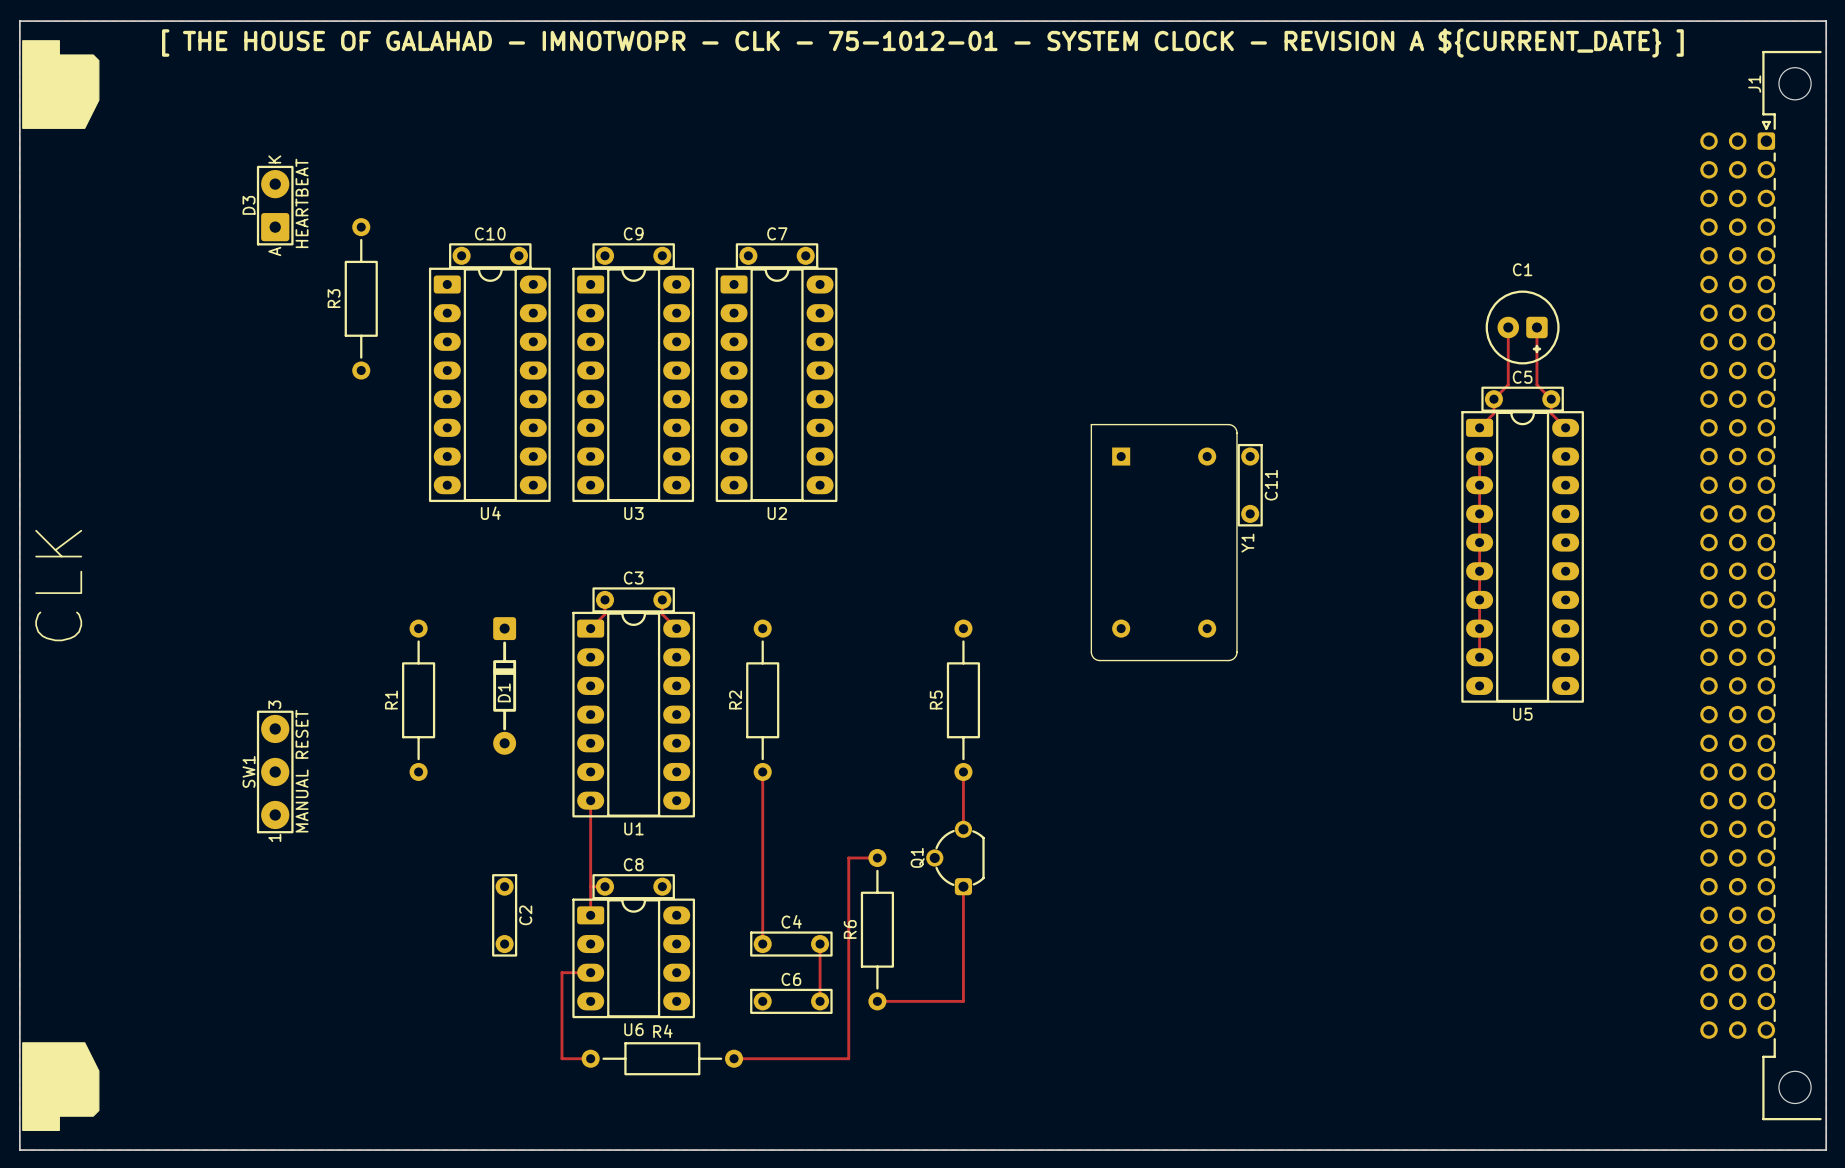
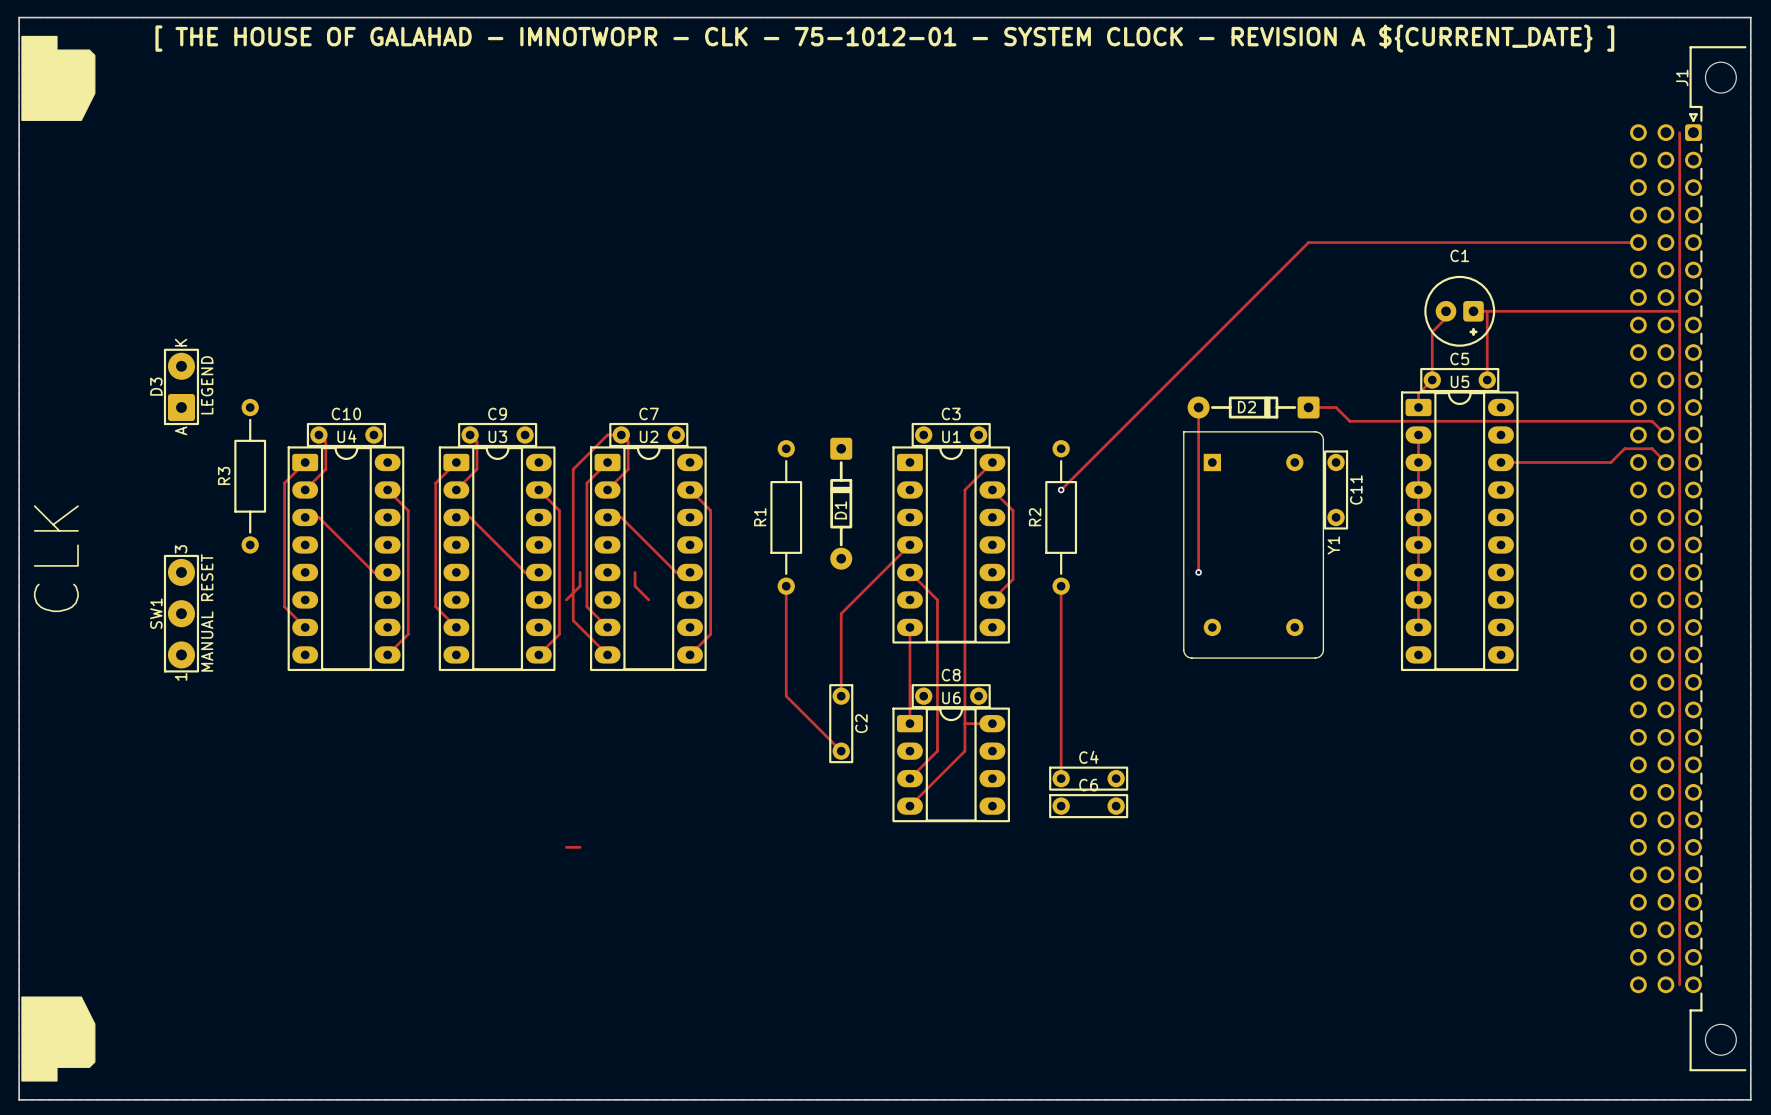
track: none -> (1679, 132) (1679, 984)
D3 text: HEARTBEAT (302, 203) -> LEGEND (207, 385)
D3 position: (275, 205) -> (181, 386)
C10 position: (490, 255) -> (346, 435)
C9 position: (633, 255) -> (497, 435)
C7 position: (777, 255) -> (648, 435)
track: none -> (1638, 242) (1308, 242) (1061, 489)
R3 position: (361, 298) -> (250, 476)
track: (1508, 327) (1508, 384) (1493, 399) (1493, 413) (1479, 427) -> (1446, 318) (1432, 331) (1432, 380) (1418, 393) (1418, 407)
track: (1536, 327) (1536, 384) (1551, 399) (1551, 413) (1565, 427) -> (1473, 311) (1679, 311)
track: none -> (1487, 311) (1487, 380)
U4 position: (489, 384) -> (345, 558)
U3 position: (633, 384) -> (497, 558)
U2 position: (776, 384) -> (648, 558)
track: none -> (1198, 407) (1198, 572)
D2: none -> (1253, 407)
track: none -> (1308, 407) (1336, 407) (1349, 421) (1652, 421) (1665, 435)
track: none -> (318, 435) (325, 441) (325, 469) (305, 489)
track: none -> (470, 435) (476, 441) (476, 469) (456, 489)
track: none -> (305, 462) (284, 483) (284, 606) (305, 627)
track: none -> (456, 462) (435, 483) (435, 606) (456, 627)
track: none -> (607, 462) (586, 483) (586, 606) (607, 627)
track: none -> (992, 462) (964, 489) (964, 751) (909, 806)
C11 position: (1250, 485) -> (1336, 489)
track: none -> (1500, 462) (1610, 462) (1624, 448) (1652, 448) (1665, 462)
track: none -> (387, 489) (408, 510) (408, 634) (387, 654)
U4 name position: U4 (490, 513) -> U4 (346, 436)
track: none -> (538, 489) (559, 510) (559, 634) (538, 654)
track: none -> (607, 489) (628, 469) (628, 441) (621, 435) (607, 435) (573, 469) (573, 620) (607, 654)
U3 name position: U3 (633, 513) -> U3 (497, 436)
track: none -> (690, 489) (710, 510) (710, 634) (690, 654)
U2 name position: U2 (777, 513) -> U2 (649, 436)
track: none -> (992, 489) (1013, 510) (1013, 579) (992, 599)
via: none -> (1061, 489)
track: none -> (305, 517) (318, 517) (373, 572) (387, 572)
track: none -> (456, 517) (470, 517) (525, 572) (538, 572)
track: none -> (607, 517) (621, 517) (676, 572) (690, 572)
Y1 position: (1164, 542) -> (1253, 544)
track: none -> (909, 544) (841, 613) (841, 696)
C3 position: (633, 599) -> (951, 435)
track: none -> (909, 572) (937, 599) (937, 751) (909, 778)
via: none -> (1198, 572)
track: none -> (786, 586) (786, 696) (841, 751)
track: none -> (1061, 586) (1061, 778)
track: none -> (909, 627) (909, 723)
D1 position: (504, 685) -> (841, 503)
R1 position: (418, 700) -> (786, 517)
R2 position: (762, 700) -> (1061, 517)
R5: (963, 700) -> none
U1 position: (633, 714) -> (951, 544)
U5 name position: U5 (1522, 714) -> U5 (1460, 381)
track: none -> (964, 723) (992, 723)
SW1 position: (275, 771) -> (181, 613)
track: (762, 771) (762, 944) -> none
track: (963, 771) (963, 829) -> none
track: (590, 800) (590, 915) -> none
U1 name position: U1 (633, 828) -> U1 (951, 436)
track: (877, 858) (848, 858) (848, 1058) (734, 1058) -> none
Q1: (955, 858) -> none
C8 position: (633, 886) -> (951, 696)
track: (963, 886) (963, 1001) (877, 1001) -> none
C2 position: (504, 915) -> (841, 723)
R6: (877, 929) -> none
C4 position: (791, 944) -> (1088, 778)
track: (820, 944) (820, 1001) -> none
U6 position: (633, 958) -> (951, 764)
track: (590, 972) (561, 972) (561, 1058) (590, 1058) -> none
C6 position: (791, 1001) -> (1088, 806)
U6 name position: U6 (633, 1029) -> U6 (951, 698)
R4: (662, 1058) -> none

